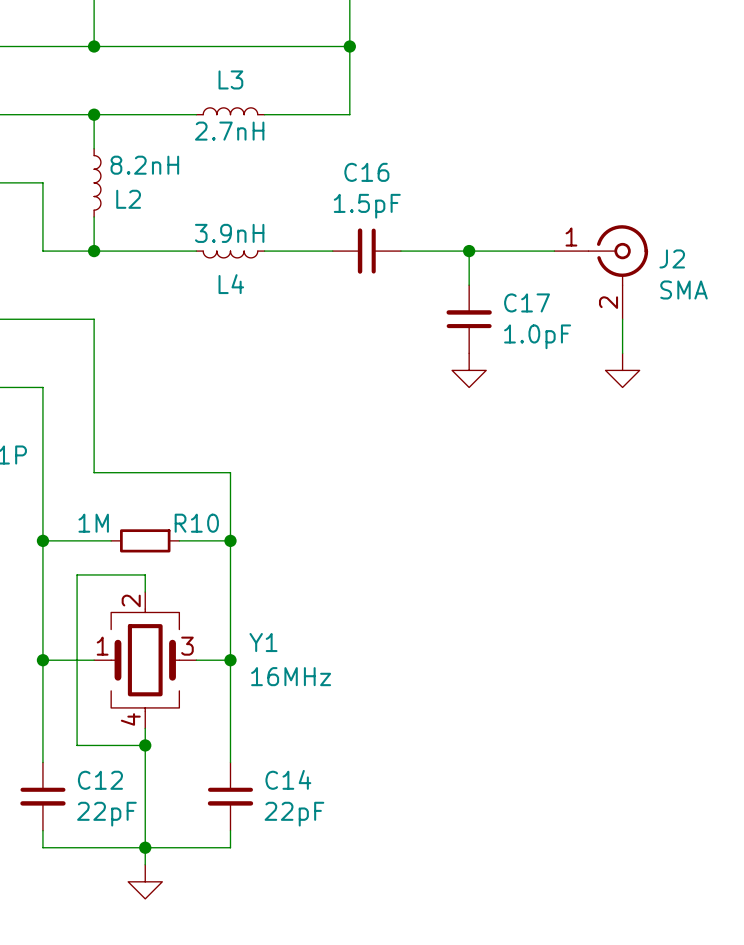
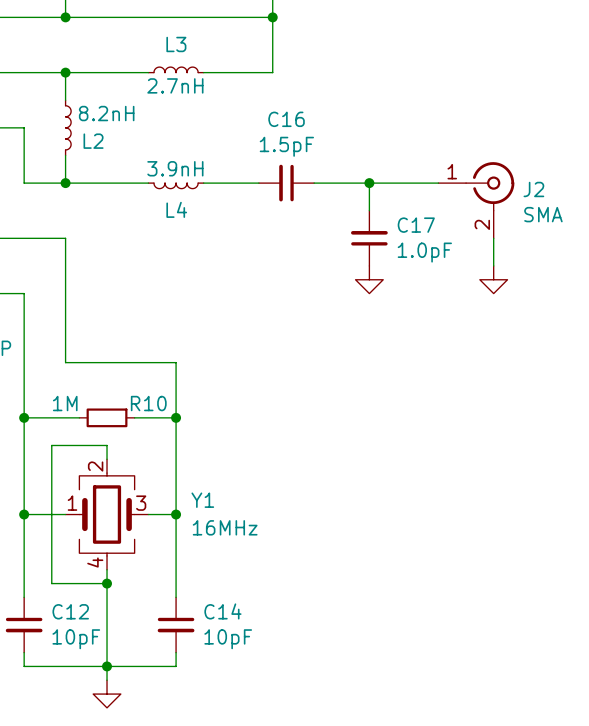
C12 value: 22pF (106, 814) -> 10pF (76, 639)
C14 value: 22pF (294, 814) -> 10pF (228, 639)

